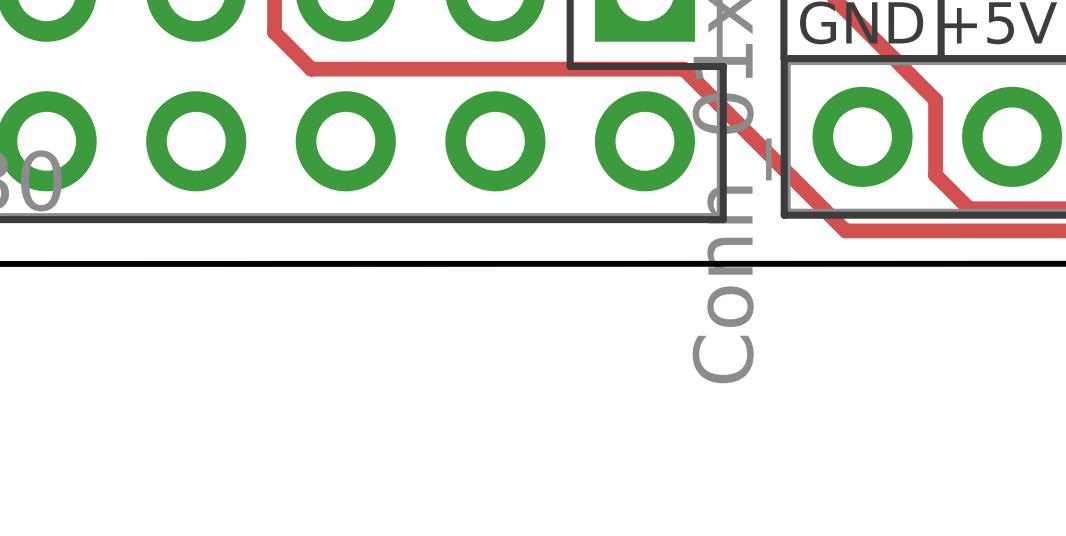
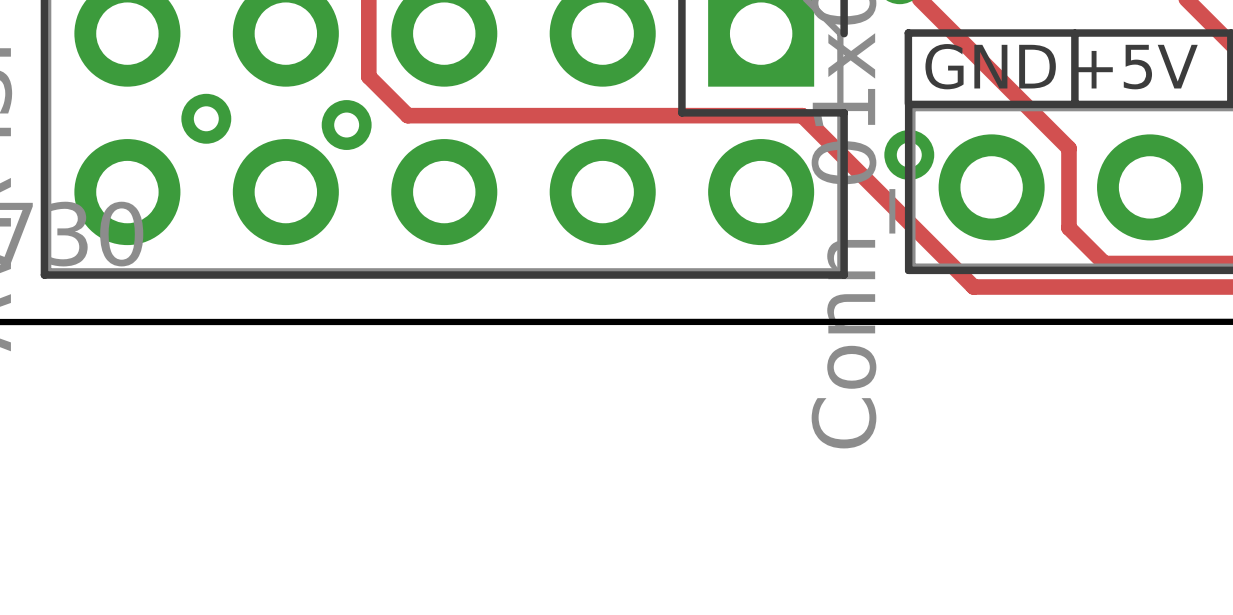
via: none -> (206, 118)
via: none -> (346, 125)
via: none -> (909, 154)

